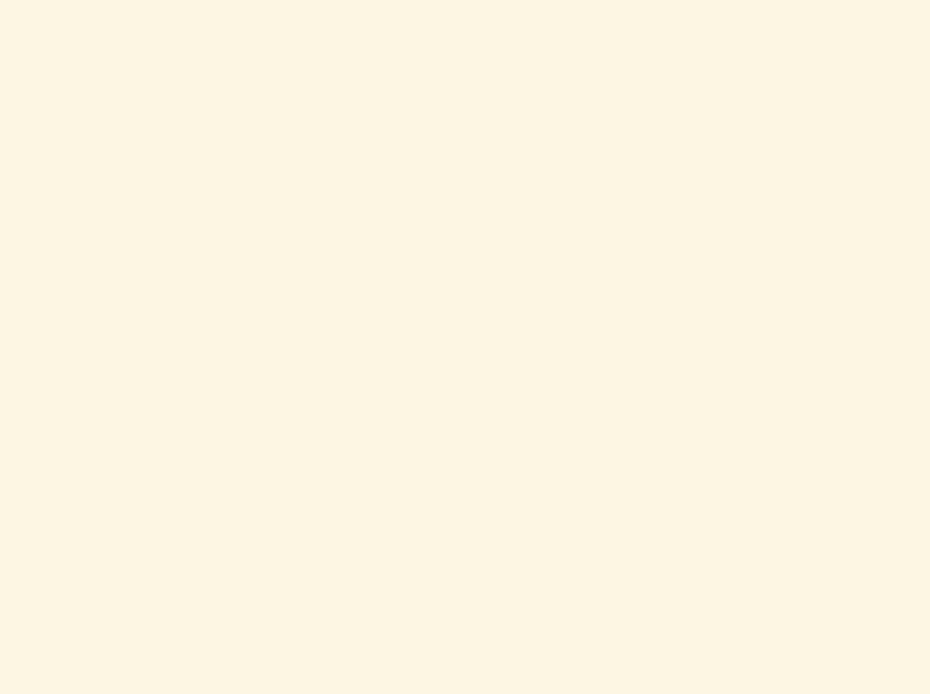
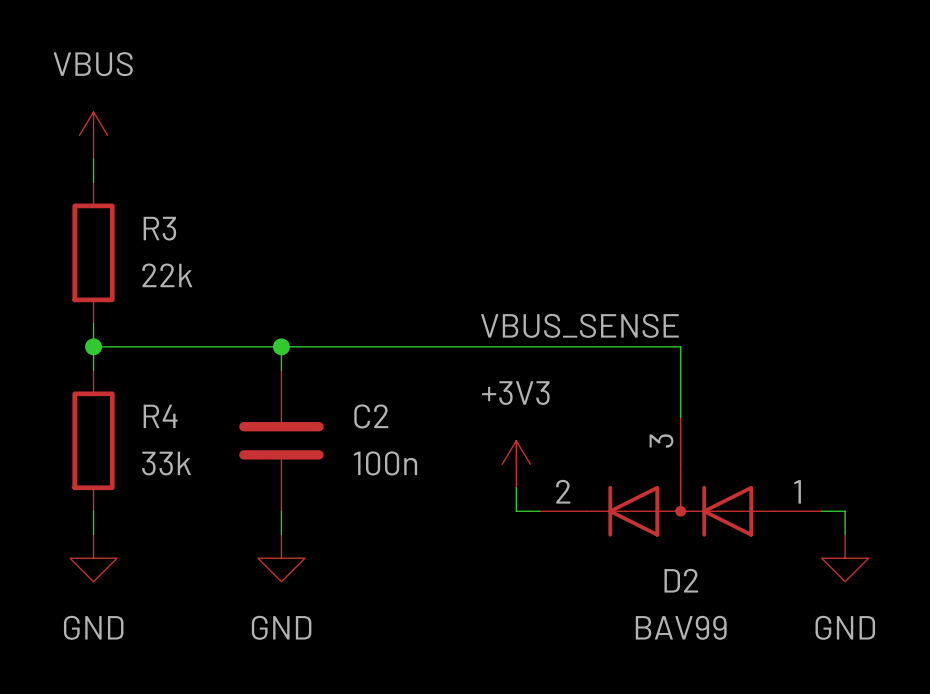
power symbol: none -> VBUS (93, 135)
wire: none -> (93, 158) (93, 182)
R3: none -> 22k (93, 252)
wire: none -> (93, 323) (93, 370)
label: none -> VBUS_SENSE (579, 325)
wire: none -> (93, 346) (680, 346) (680, 417)
junction: none -> (93, 346)
wire: none -> (281, 346) (281, 370)
junction: none -> (281, 346)
R4: none -> 33k (93, 440)
C2: none -> 100n (281, 440)
power symbol: none -> +3V3 (516, 464)
D2: none -> BAV99 (680, 476)
wire: none -> (516, 487) (516, 511) (539, 511)
wire: none -> (93, 511) (93, 534)
wire: none -> (281, 511) (281, 534)
wire: none -> (821, 511) (845, 511) (845, 534)
power symbol: none -> GND (93, 558)
power symbol: none -> GND (281, 558)
power symbol: none -> GND (845, 558)

